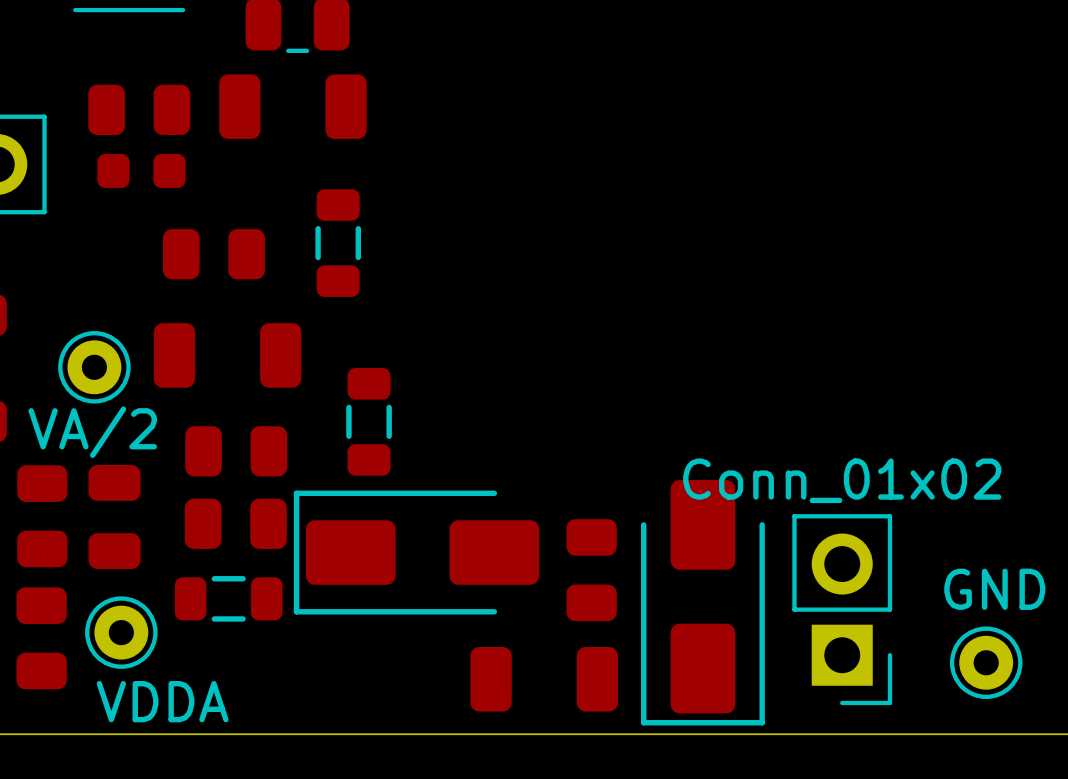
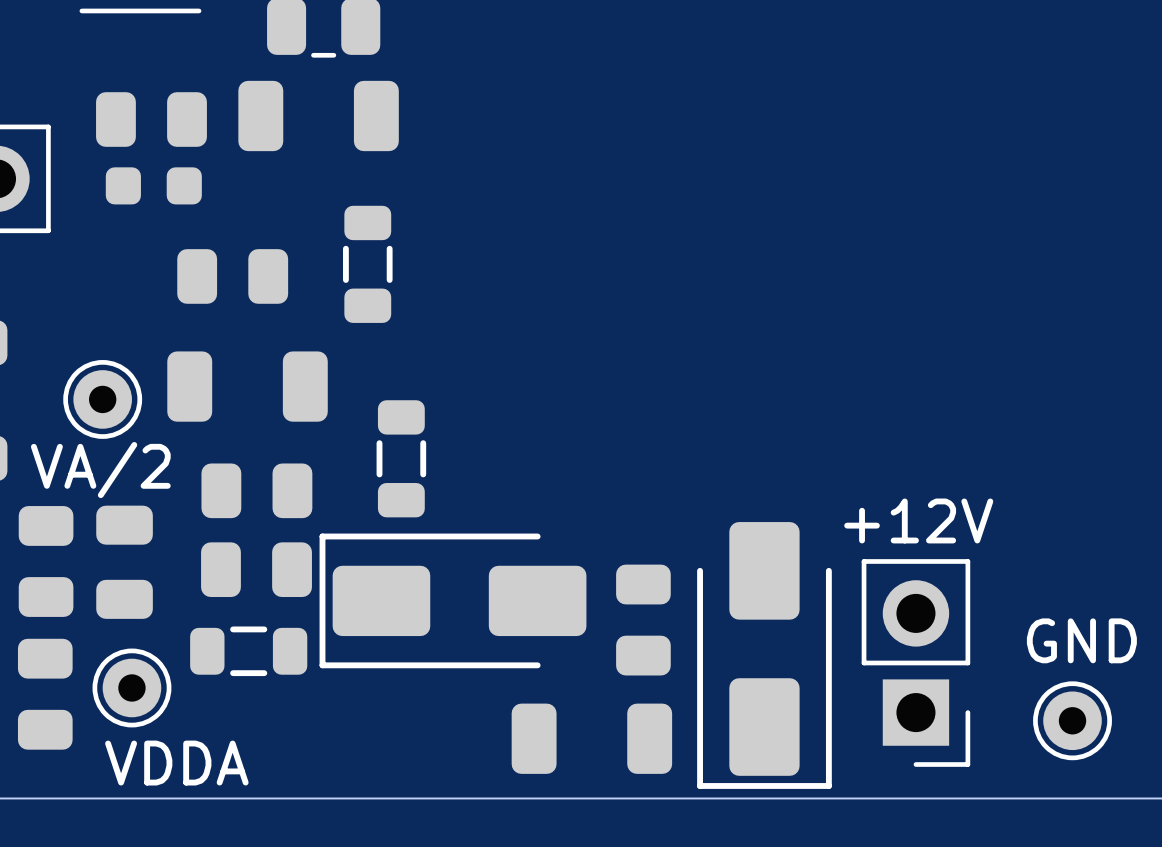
part value: Conn_01x02 (842, 480) -> +12V (918, 520)

